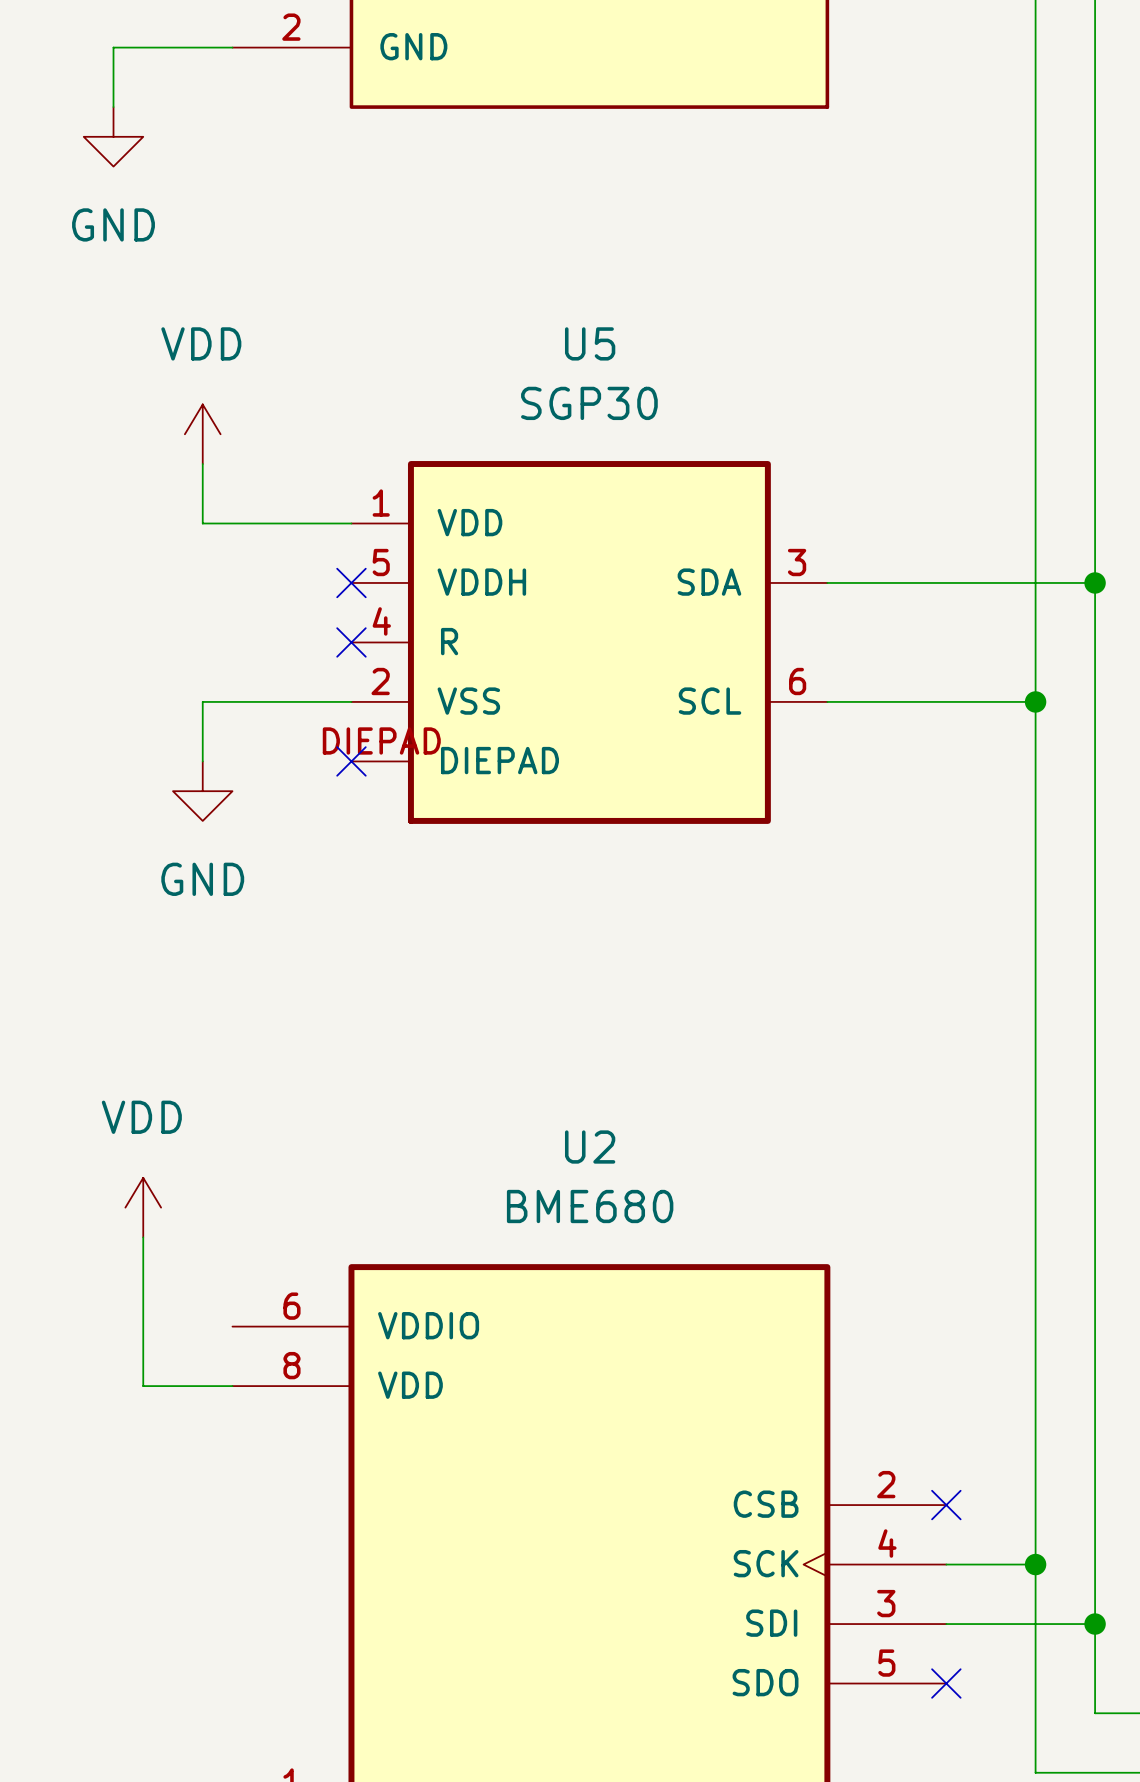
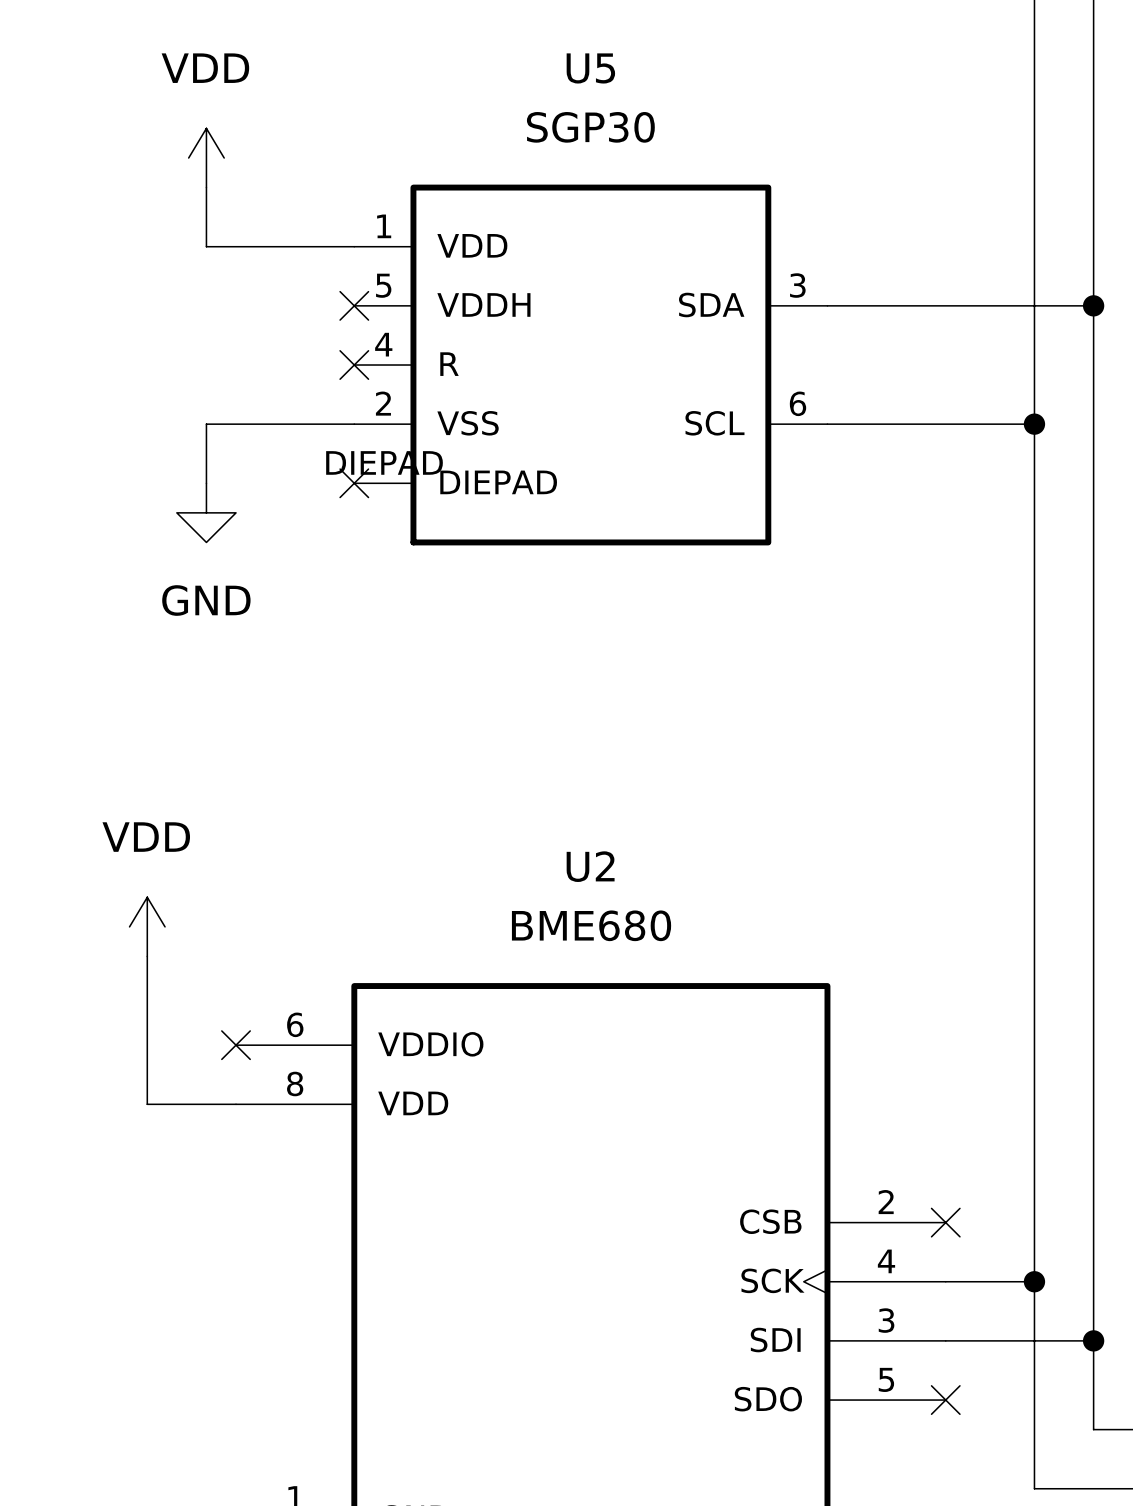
no-connect mark: none -> (236, 1045)

